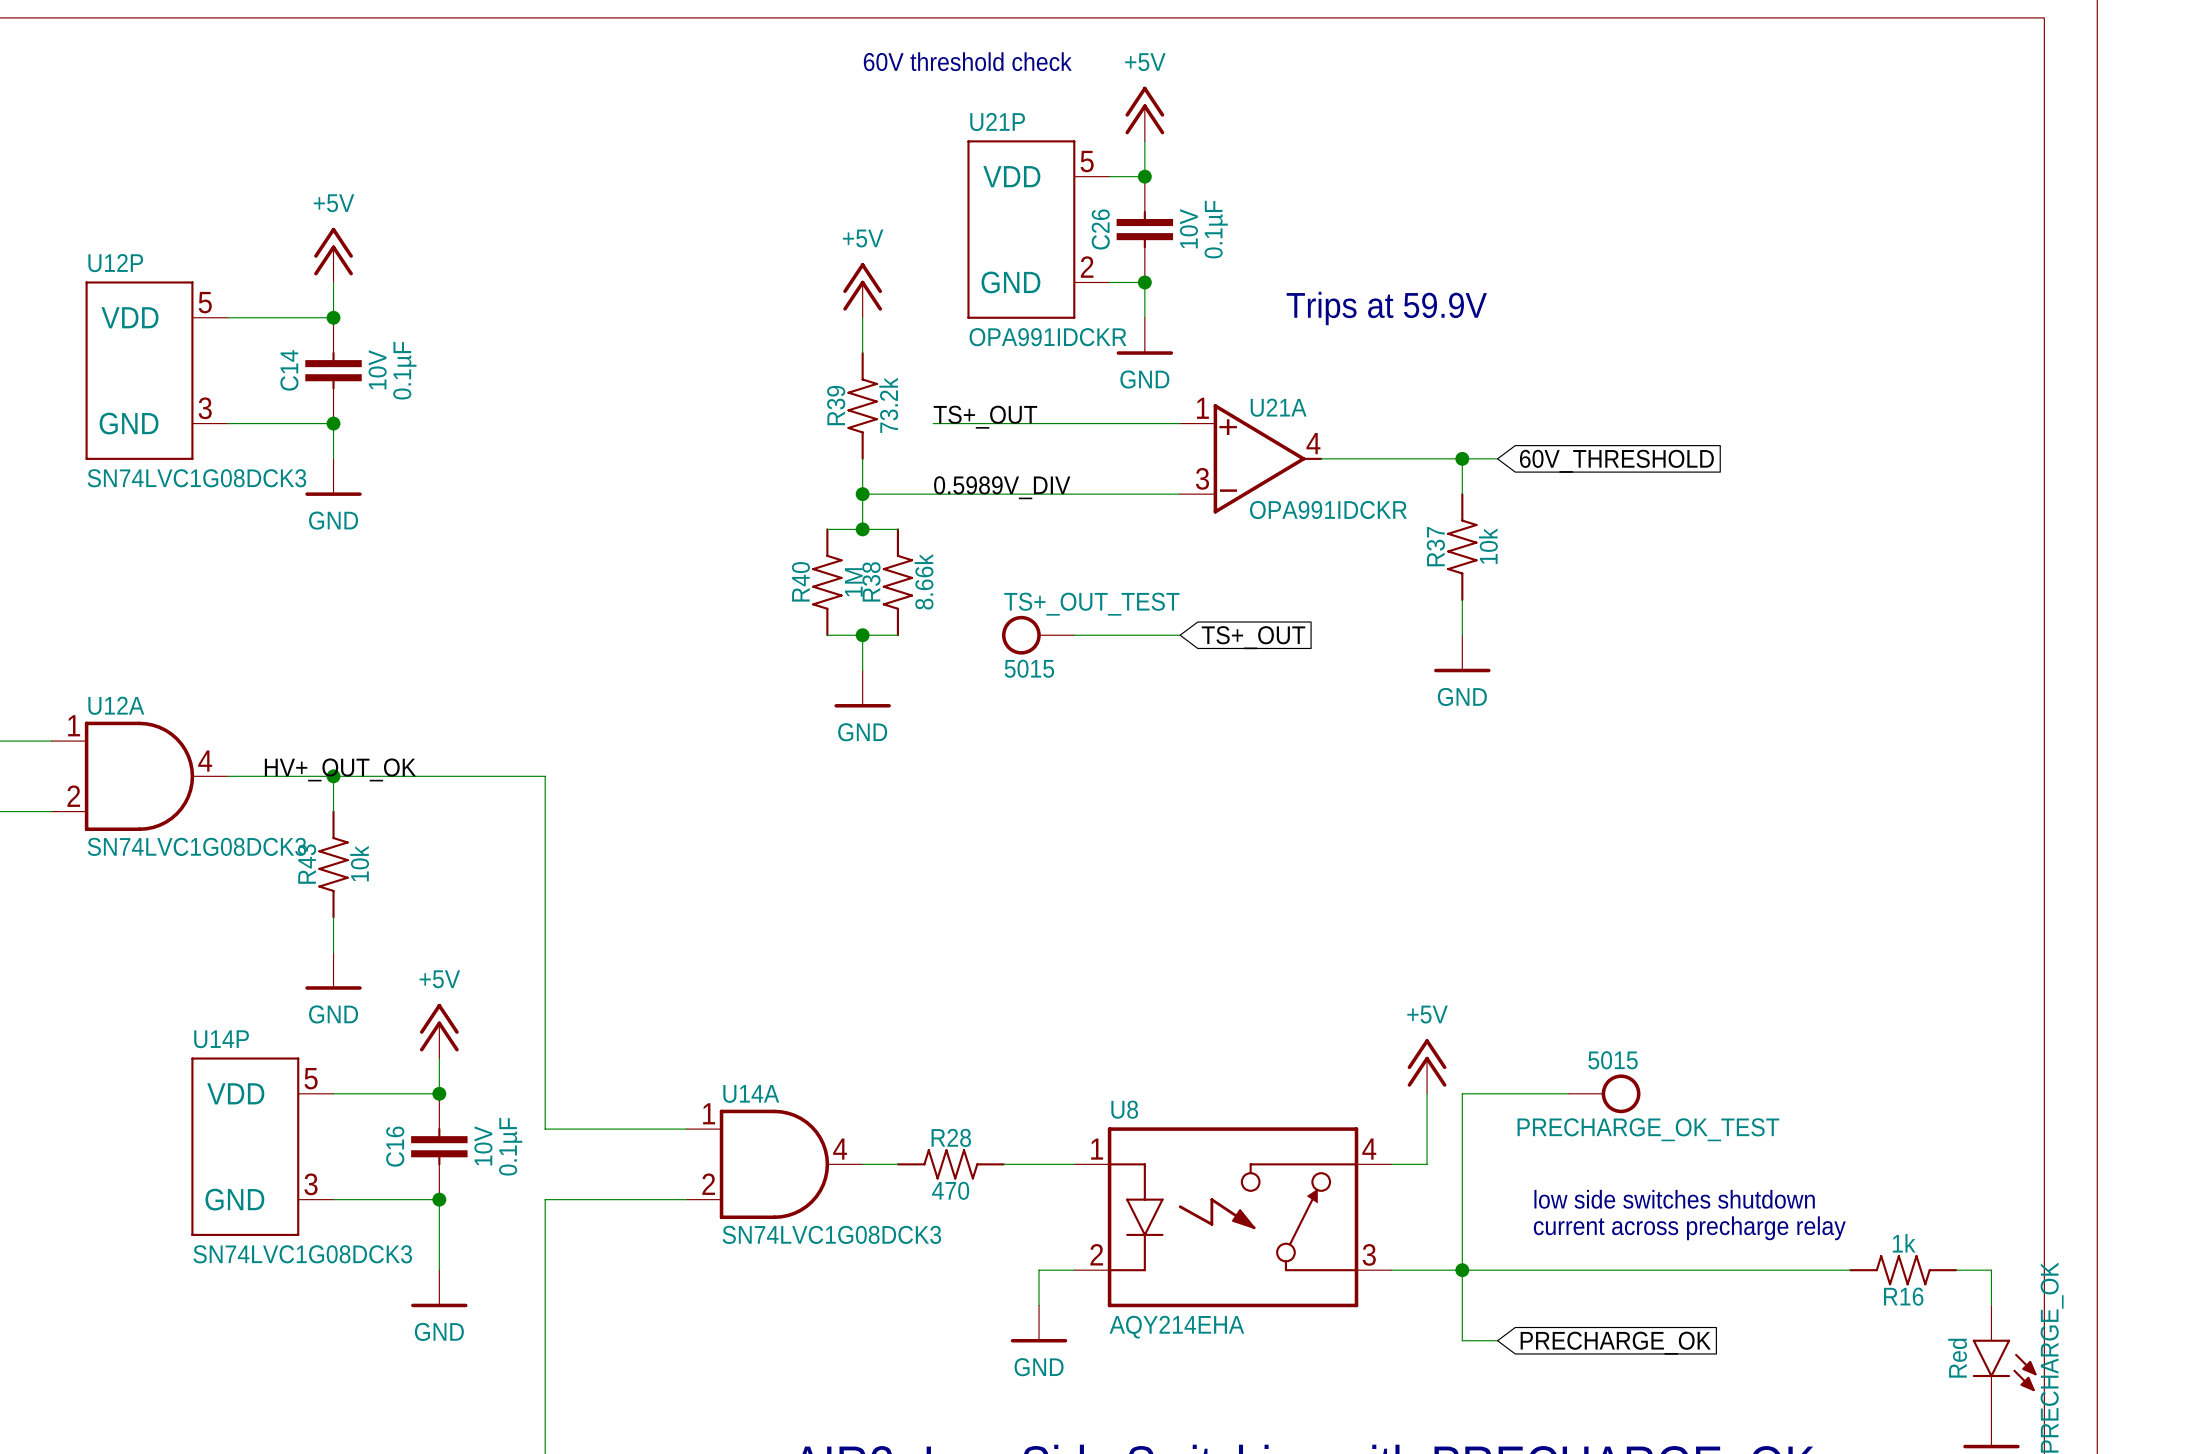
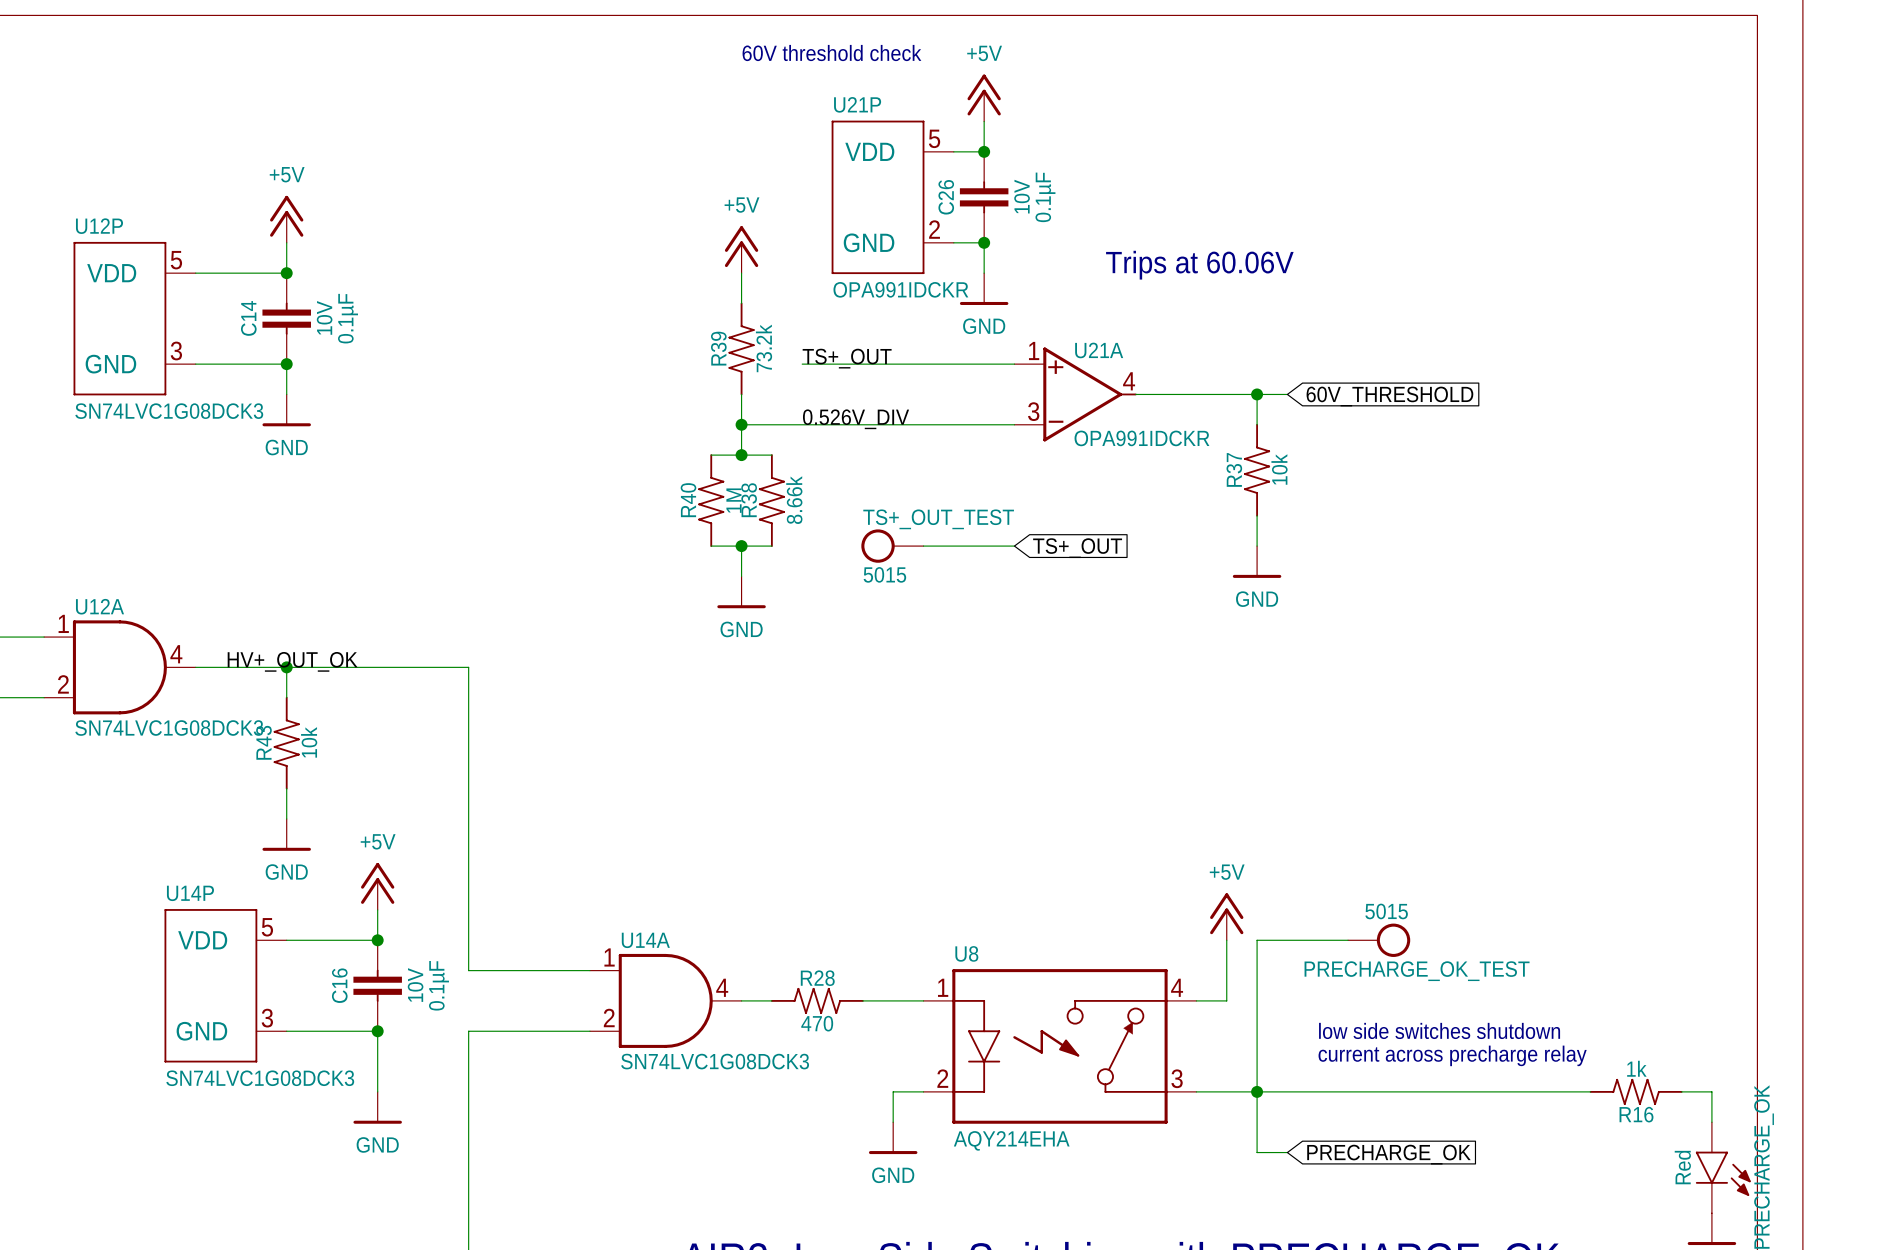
text: Trips at 59.9V (1386, 308) -> Trips at 60.06V (1199, 265)
label: 0.5989V_DIV (1002, 487) -> 0.526V_DIV (856, 419)

